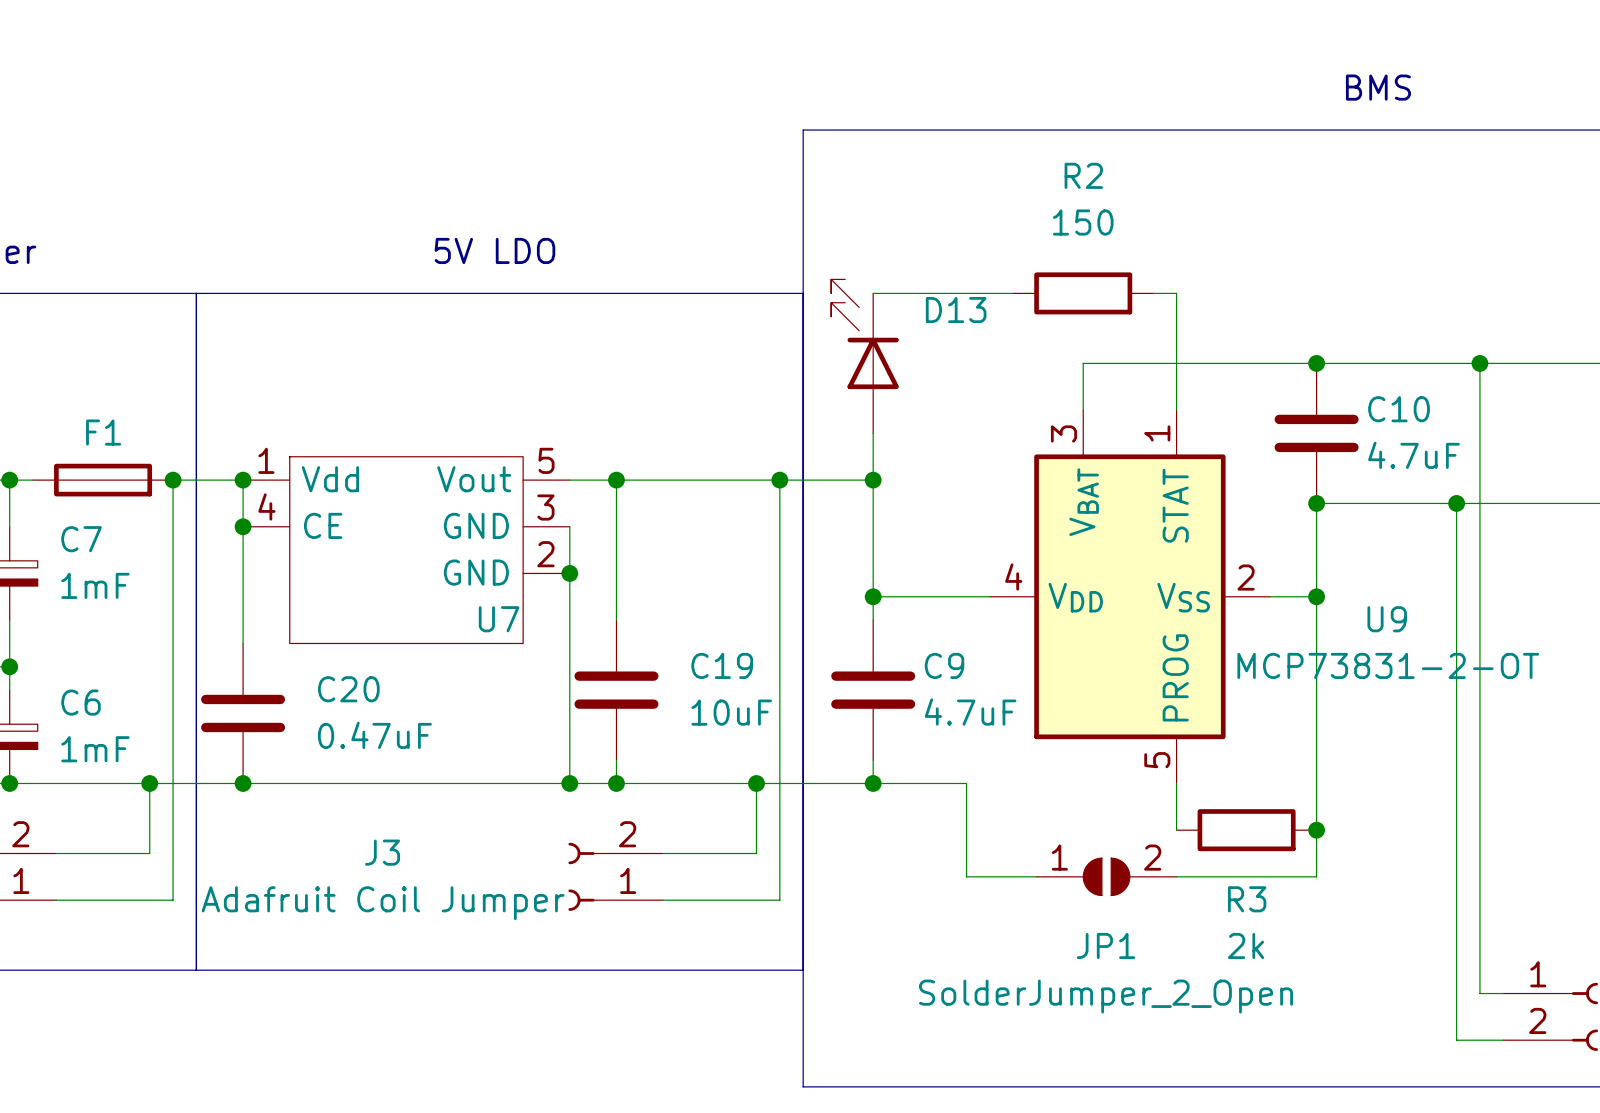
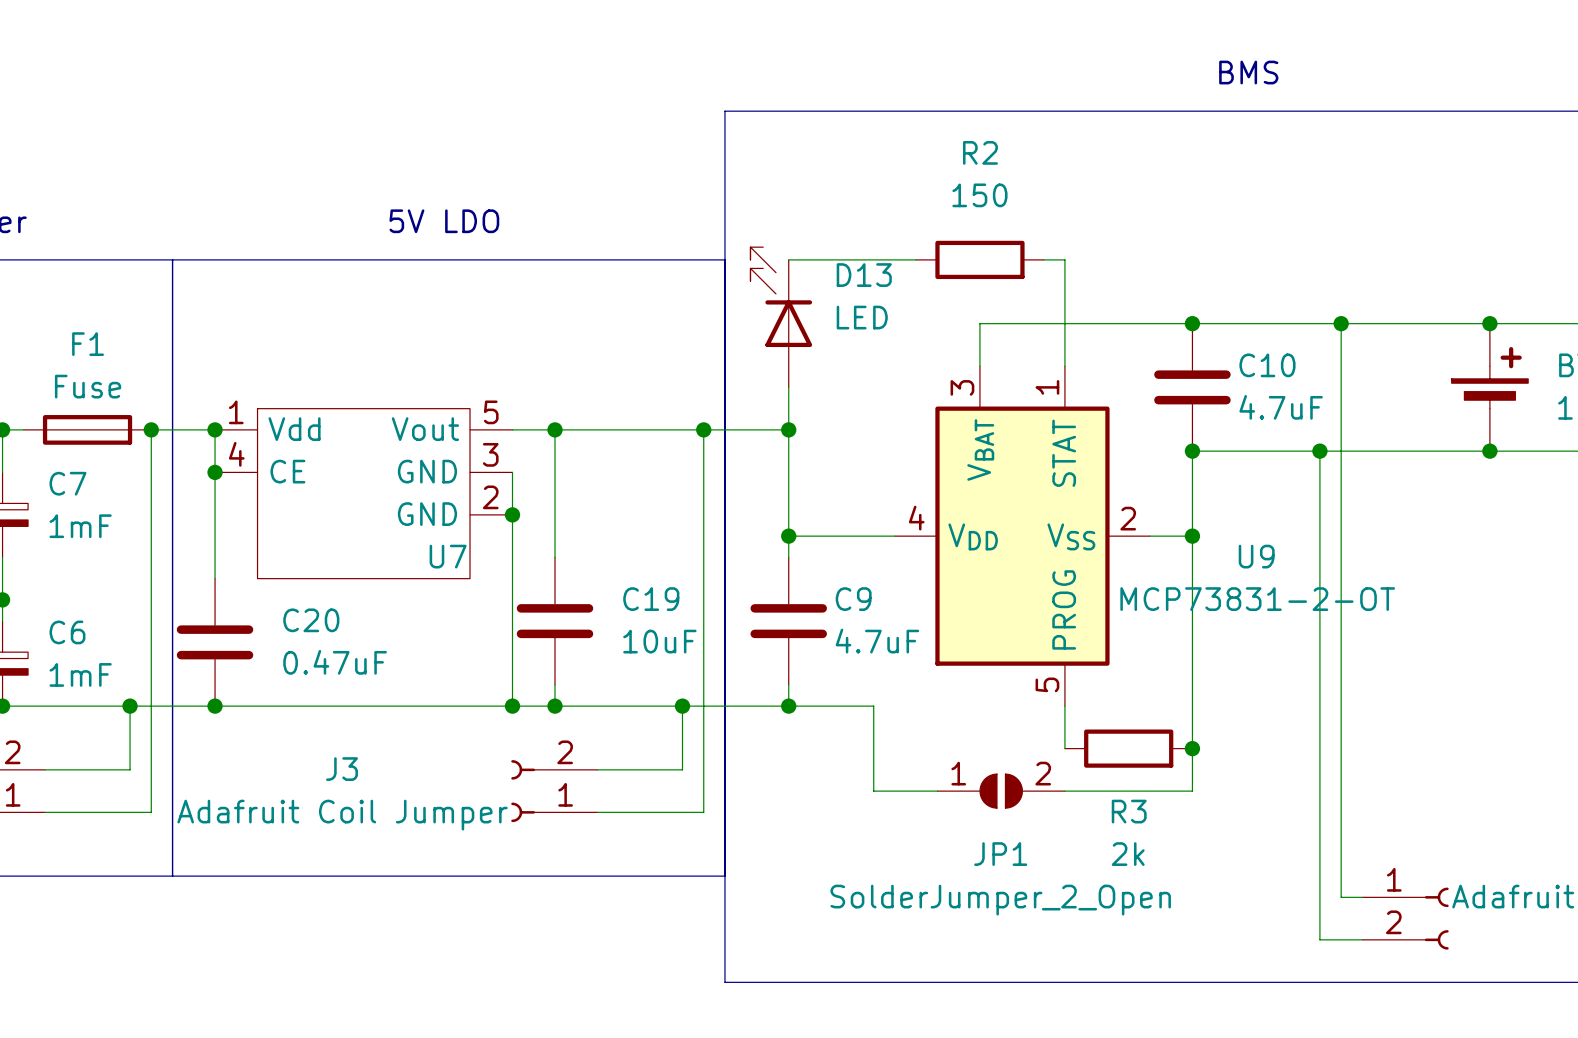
D13 value: none -> LED (862, 317)
F1 name position: F1 (103, 432) -> F1 (88, 344)
F1 value: none -> Fuse (88, 386)

